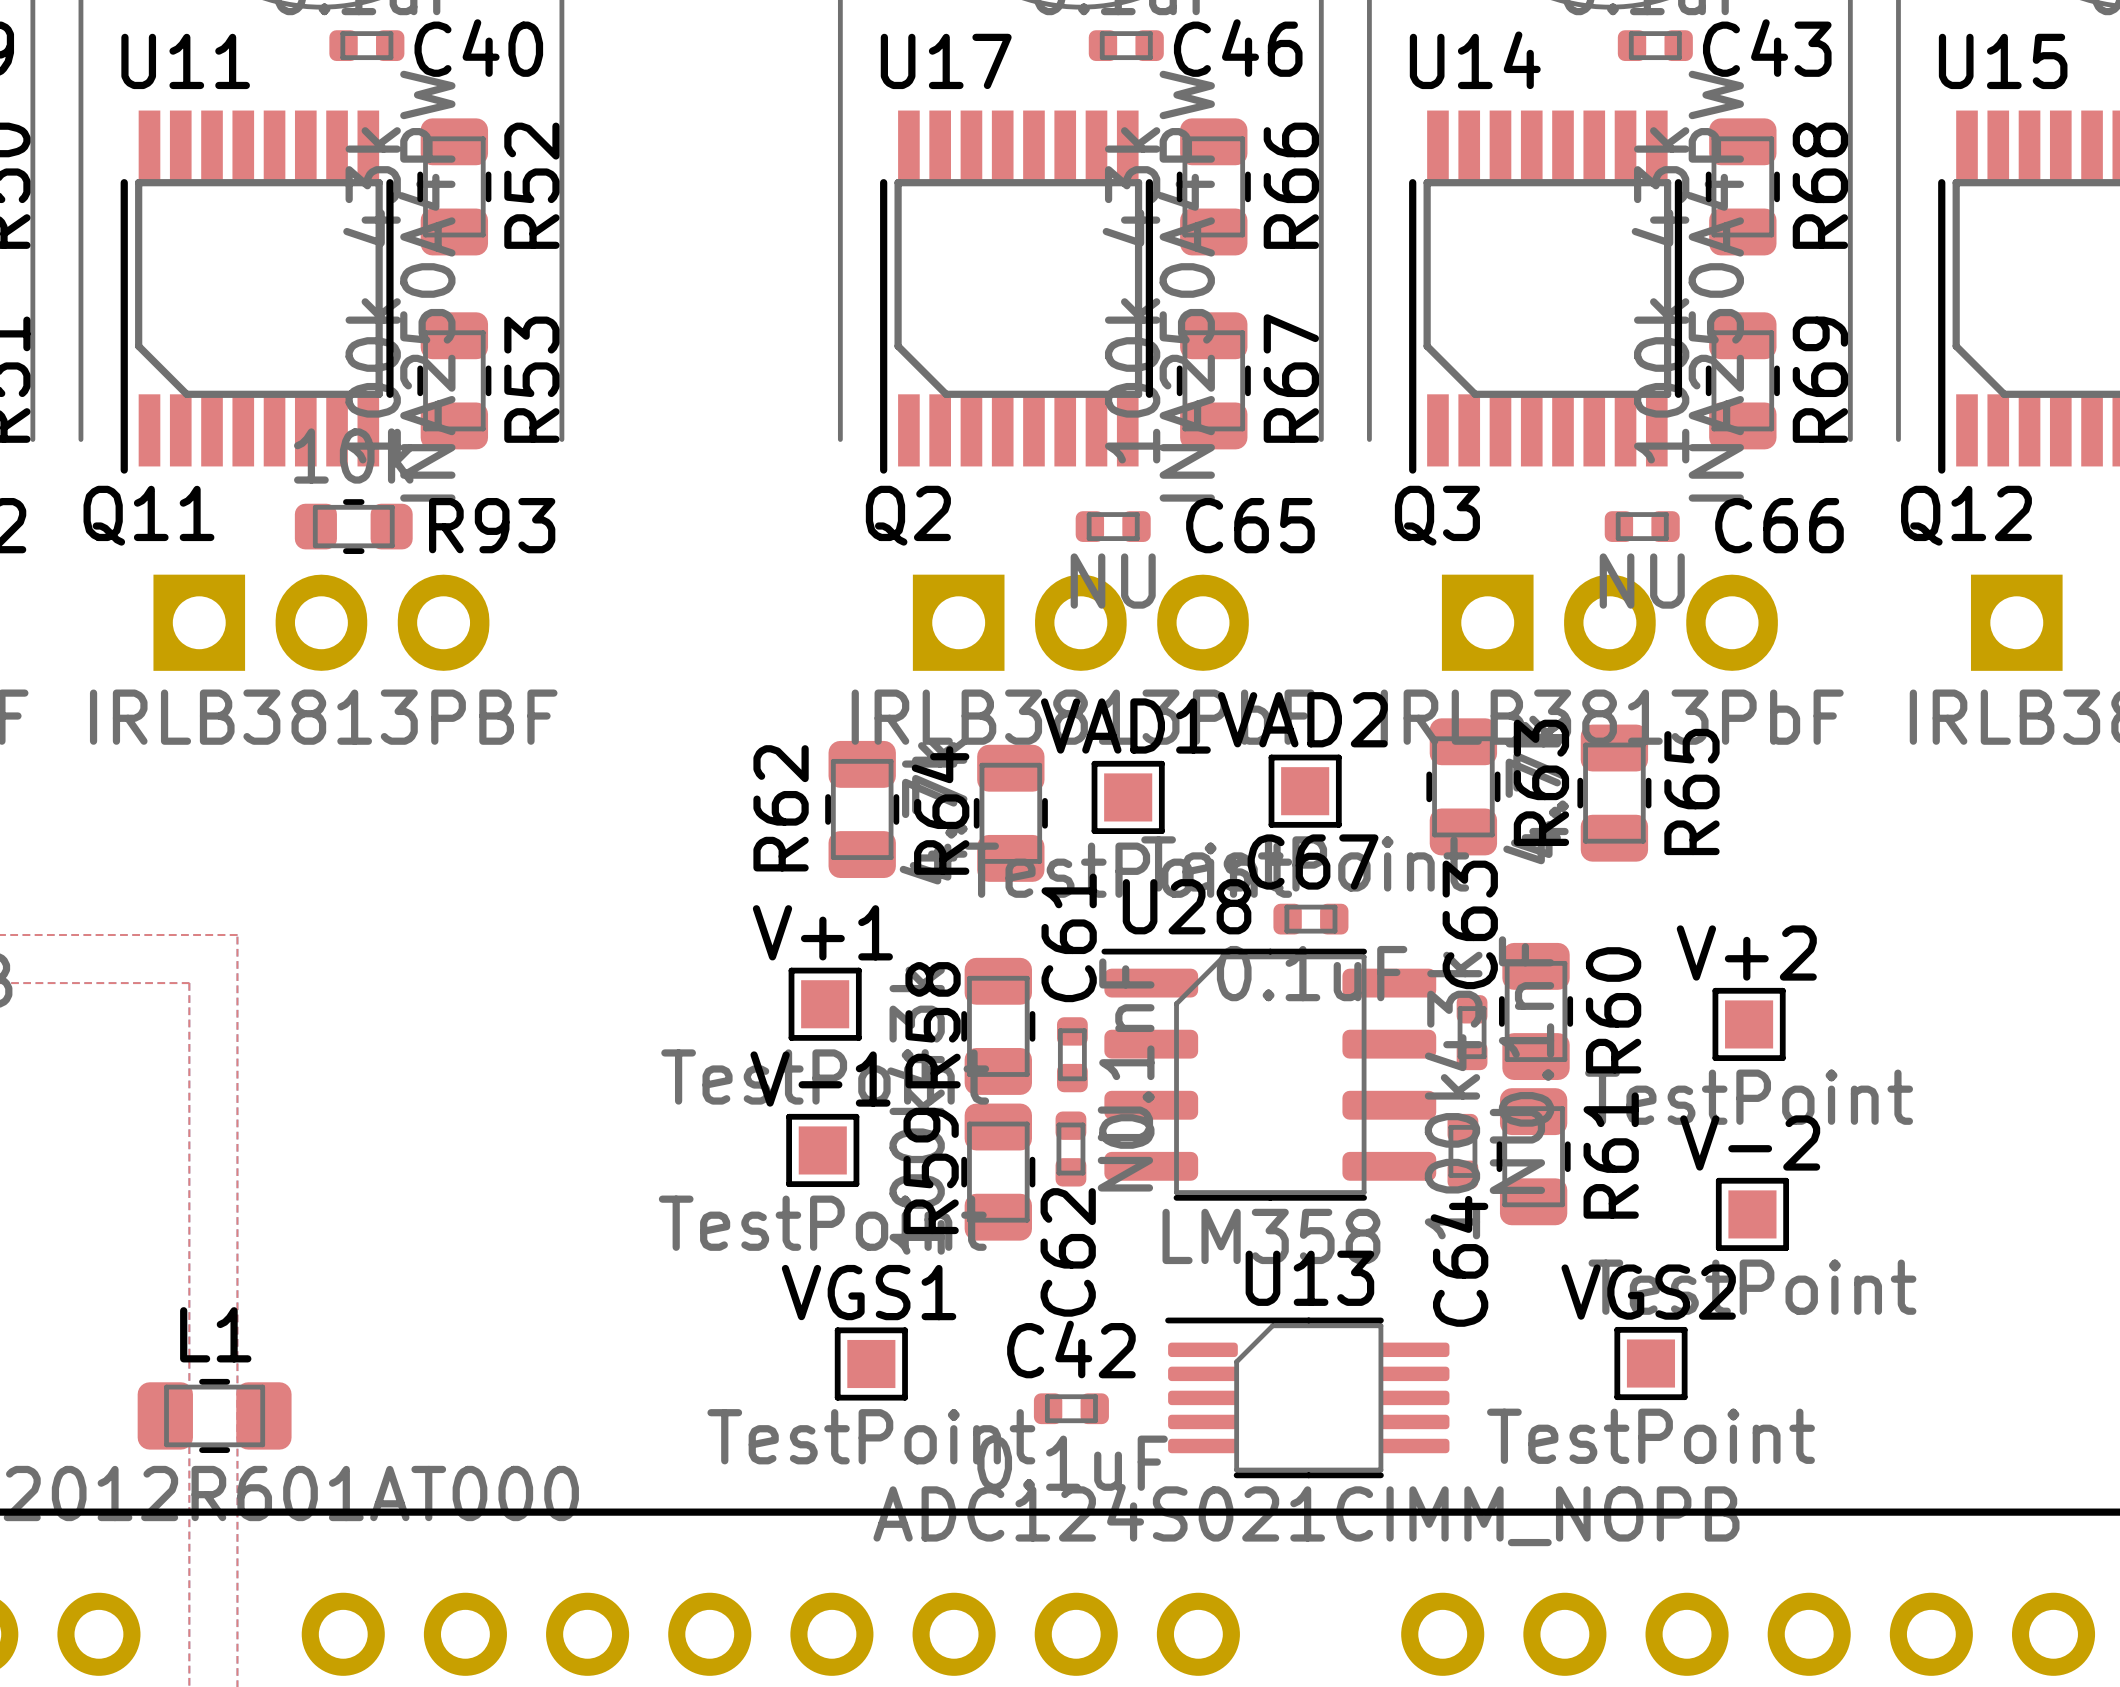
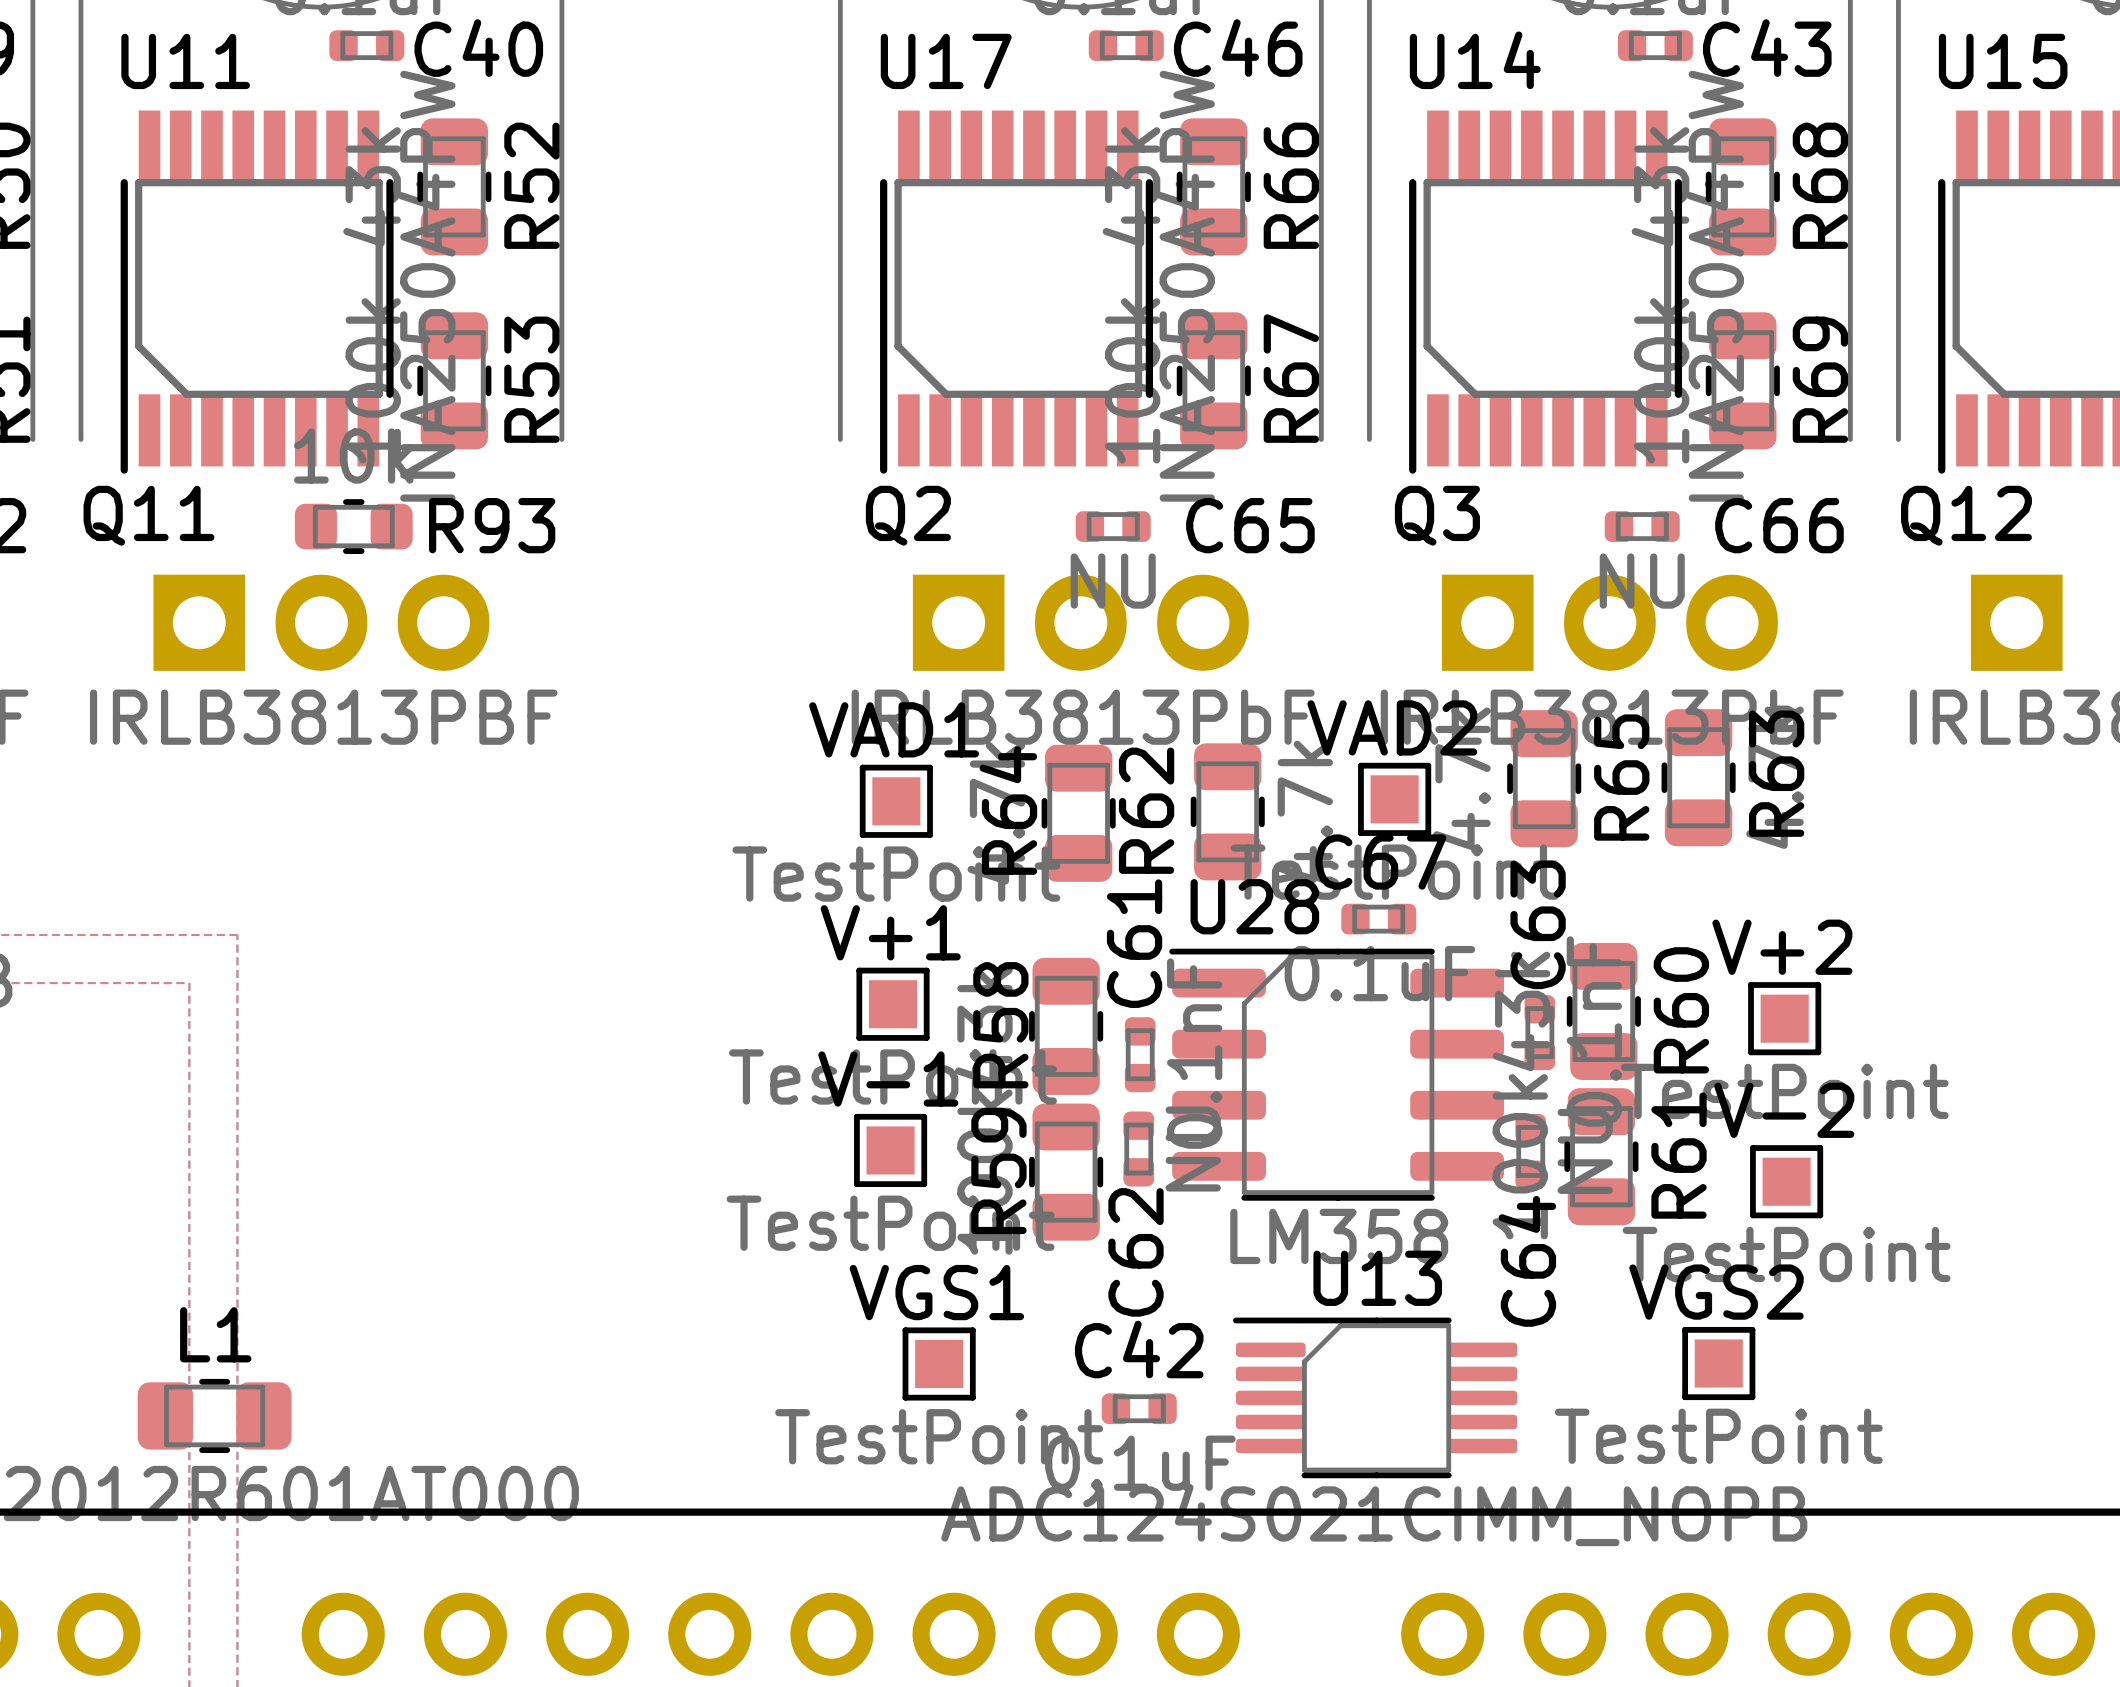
R63 position: (1463, 786) -> (1698, 777)
VAD2 position: (1305, 791) -> (1394, 799)
R65 position: (1614, 793) -> (1544, 778)
VAD1 position: (1128, 797) -> (896, 801)
R62 position: (862, 809) -> (1227, 811)
R64 position: (1010, 813) -> (1078, 813)
C67 position: (1310, 919) -> (1378, 919)
C61 name position: C61 (1069, 937) -> C61 (1134, 943)
V+1 position: (825, 1004) -> (892, 1004)
R60 position: (1536, 1011) -> (1603, 1011)
V+2 position: (1749, 1024) -> (1784, 1018)
R58 position: (998, 1026) -> (1066, 1026)
C63 position: (1472, 1032) -> (1539, 1032)
C61 position: (1072, 1054) -> (1140, 1054)
U28 position: (1268, 1074) -> (1336, 1074)
C62 position: (1070, 1149) -> (1138, 1149)
V-1 position: (822, 1150) -> (890, 1150)
C64 position: (1462, 1151) -> (1530, 1151)
R61 position: (1533, 1156) -> (1601, 1156)
R59 position: (998, 1172) -> (1066, 1172)
V-2 position: (1752, 1214) -> (1786, 1181)
VGS2 position: (1650, 1363) -> (1718, 1363)
VGS1 position: (871, 1364) -> (939, 1364)
U13 position: (1307, 1397) -> (1375, 1397)
C42 position: (1071, 1408) -> (1139, 1408)

